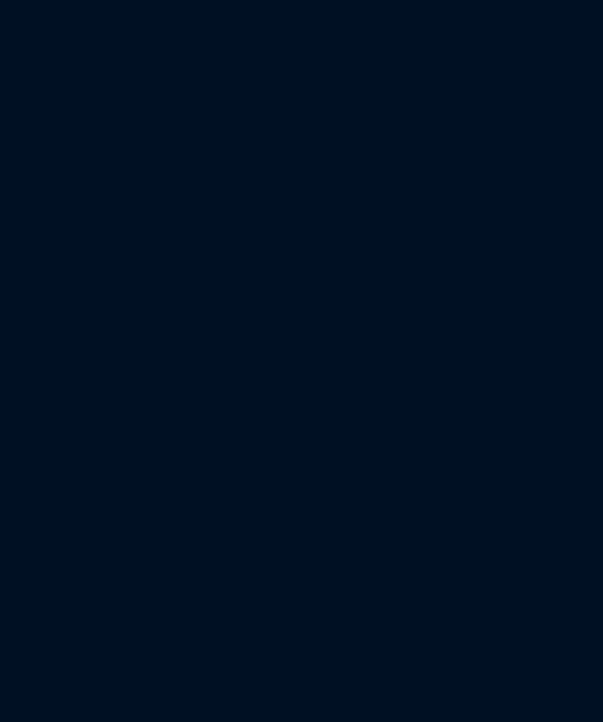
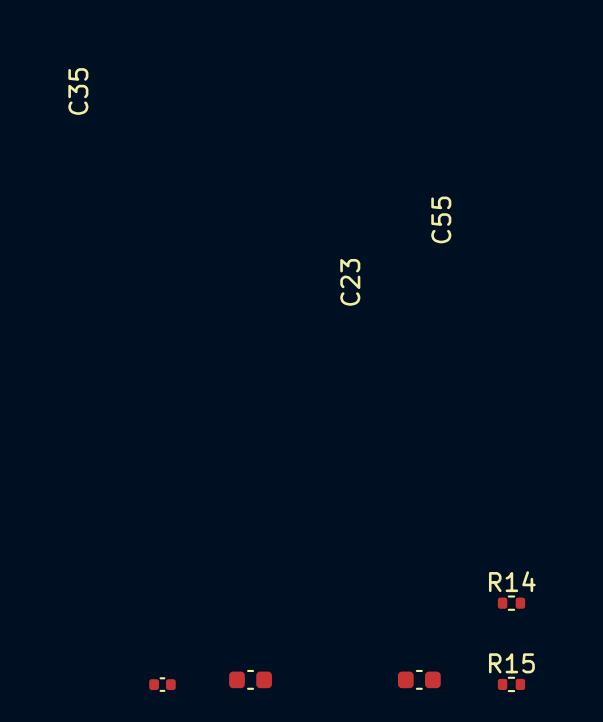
R14: none -> (511, 603)
C23: none -> (250, 679)
C55: none -> (419, 679)
C35: none -> (162, 684)
R15: none -> (511, 684)

